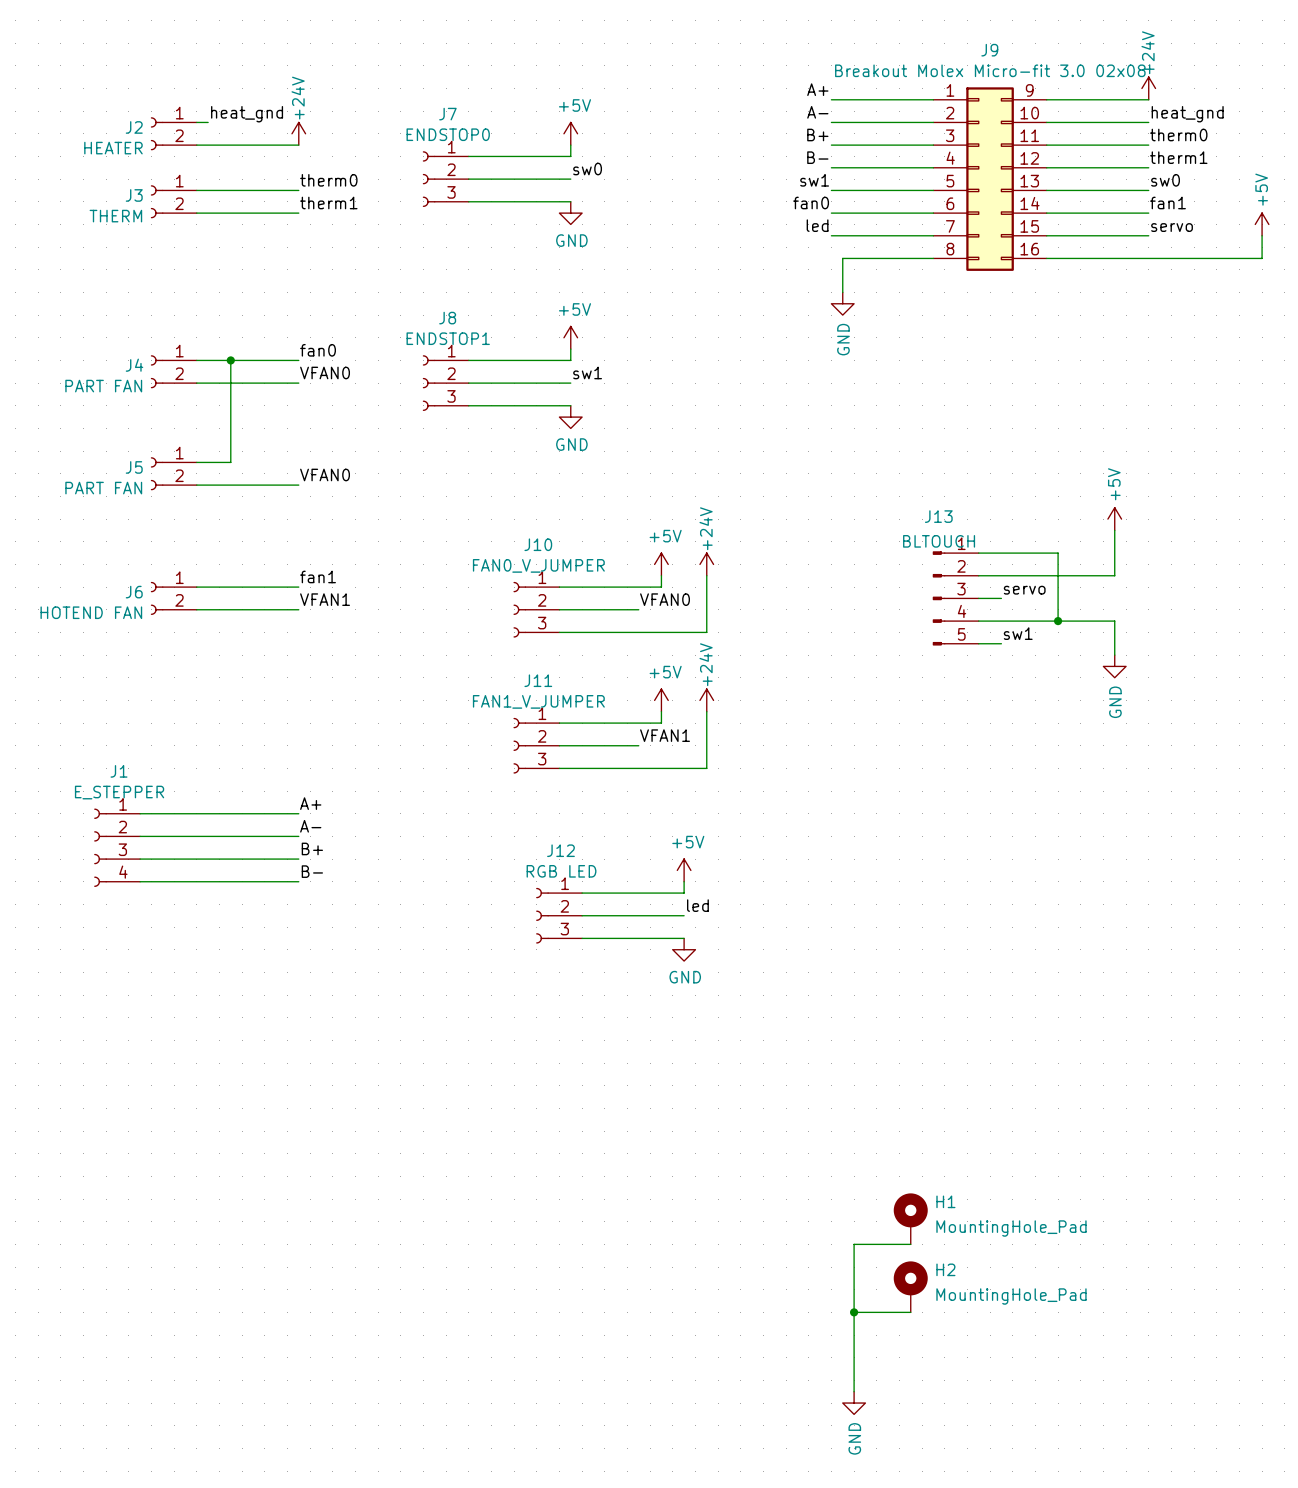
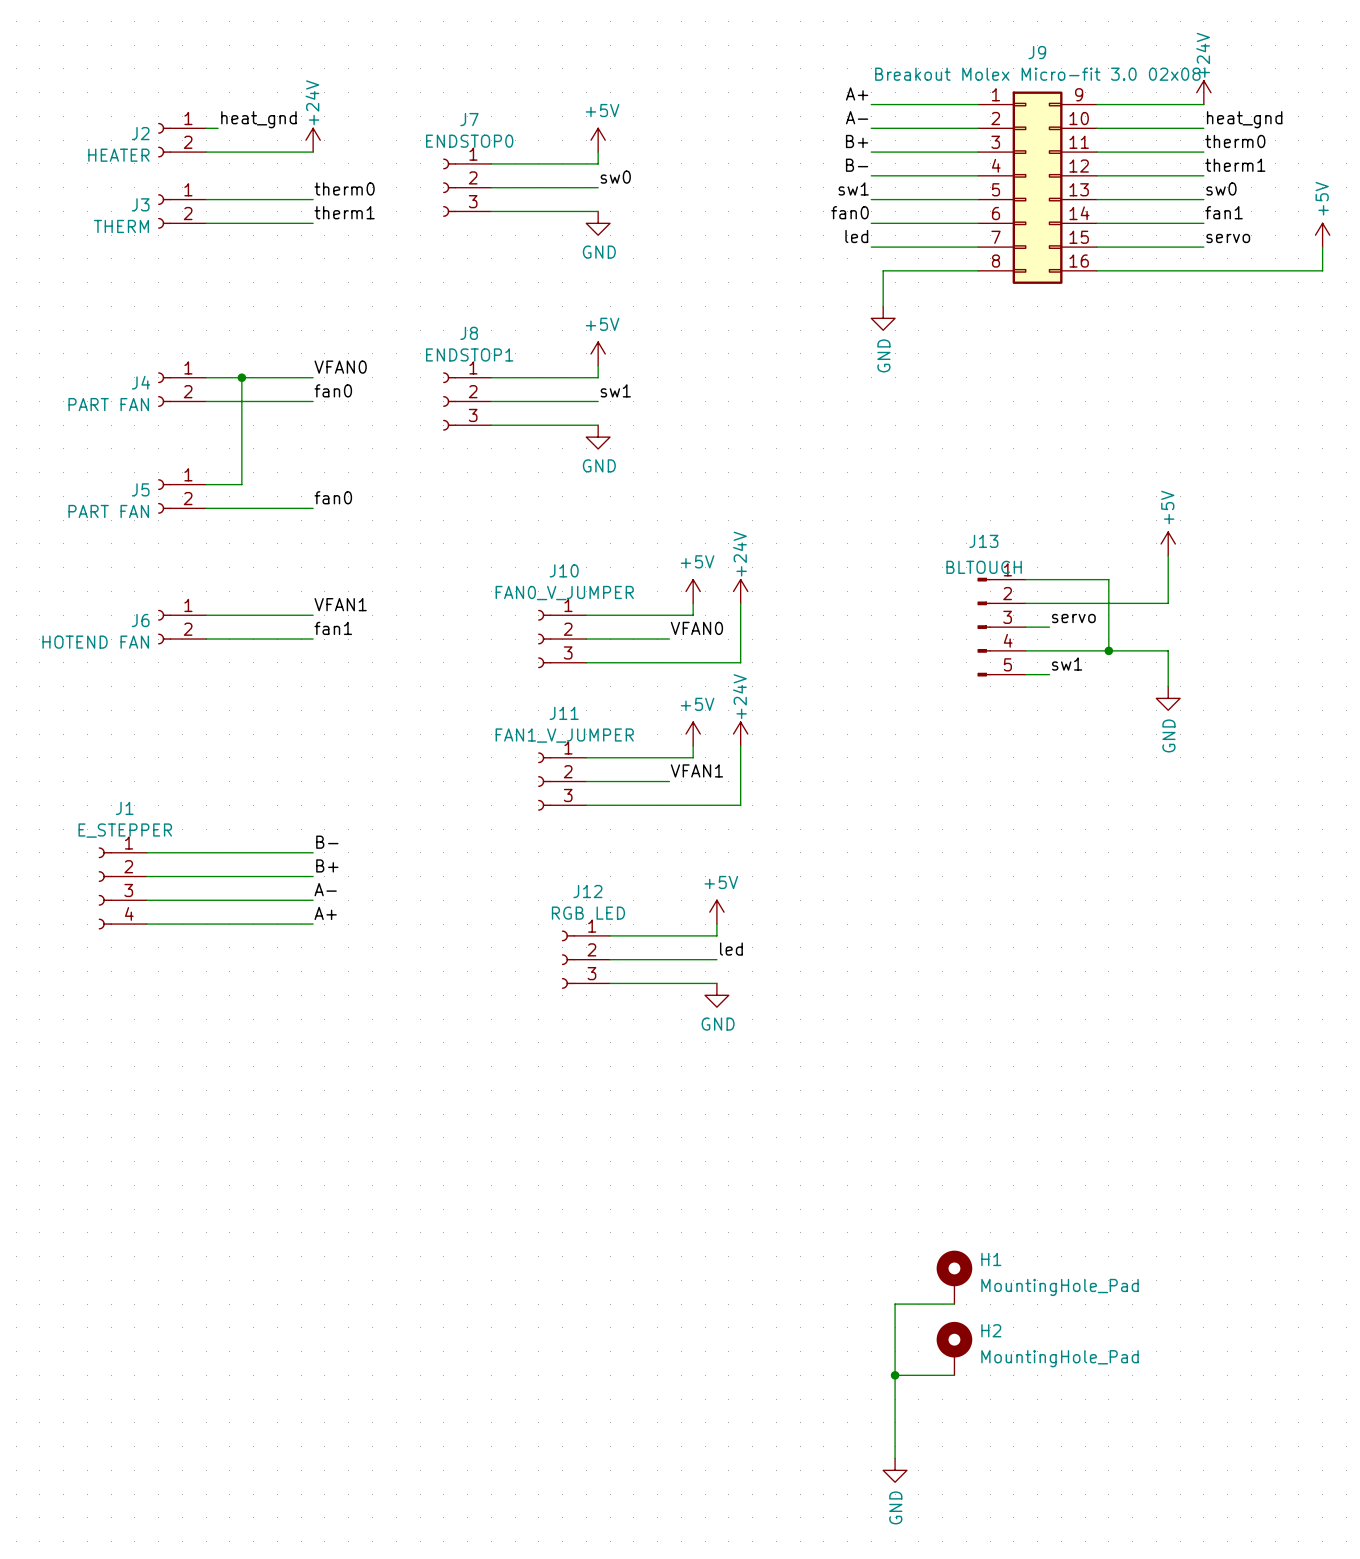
label: fan0 (318, 350) -> VFAN0 (340, 367)
label: VFAN0 (325, 372) -> fan0 (333, 390)
label: VFAN0 (325, 474) -> fan0 (333, 497)
label: fan1 (318, 576) -> VFAN1 (340, 604)
label: VFAN1 (325, 599) -> fan1 (333, 628)
label: A+ (310, 803) -> B- (327, 842)
label: A- (310, 826) -> B+ (327, 865)
label: B+ (312, 848) -> A- (325, 889)
label: B- (312, 871) -> A+ (325, 913)

